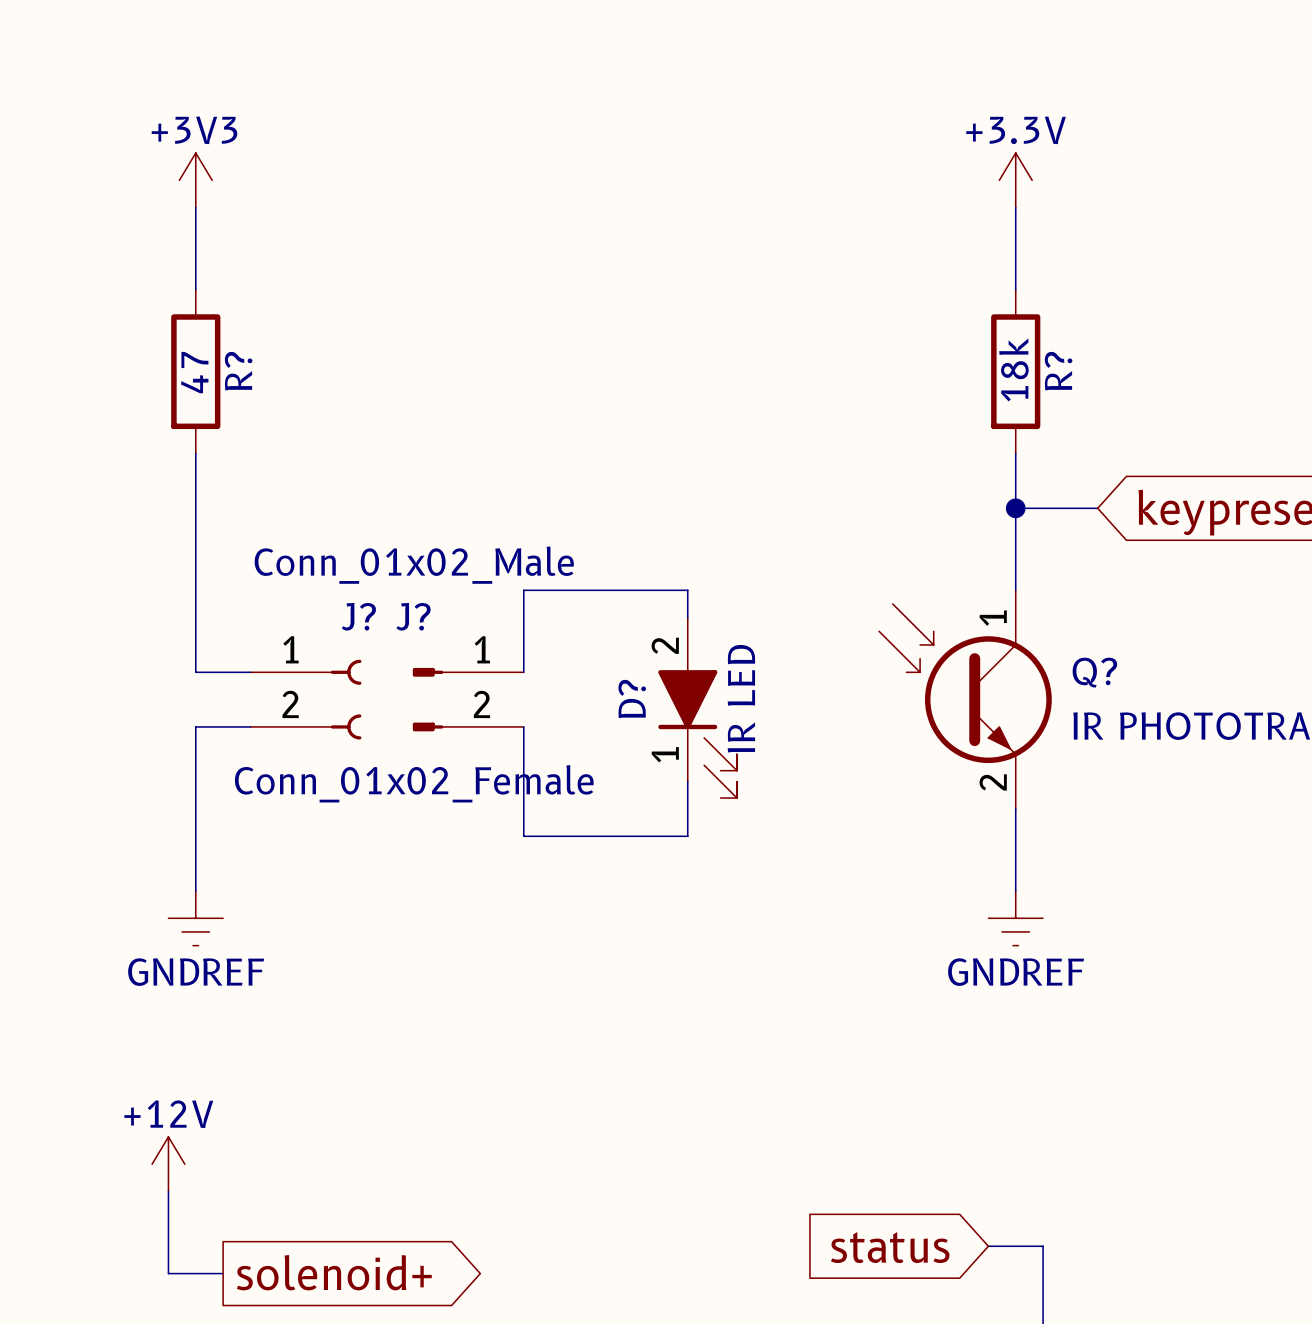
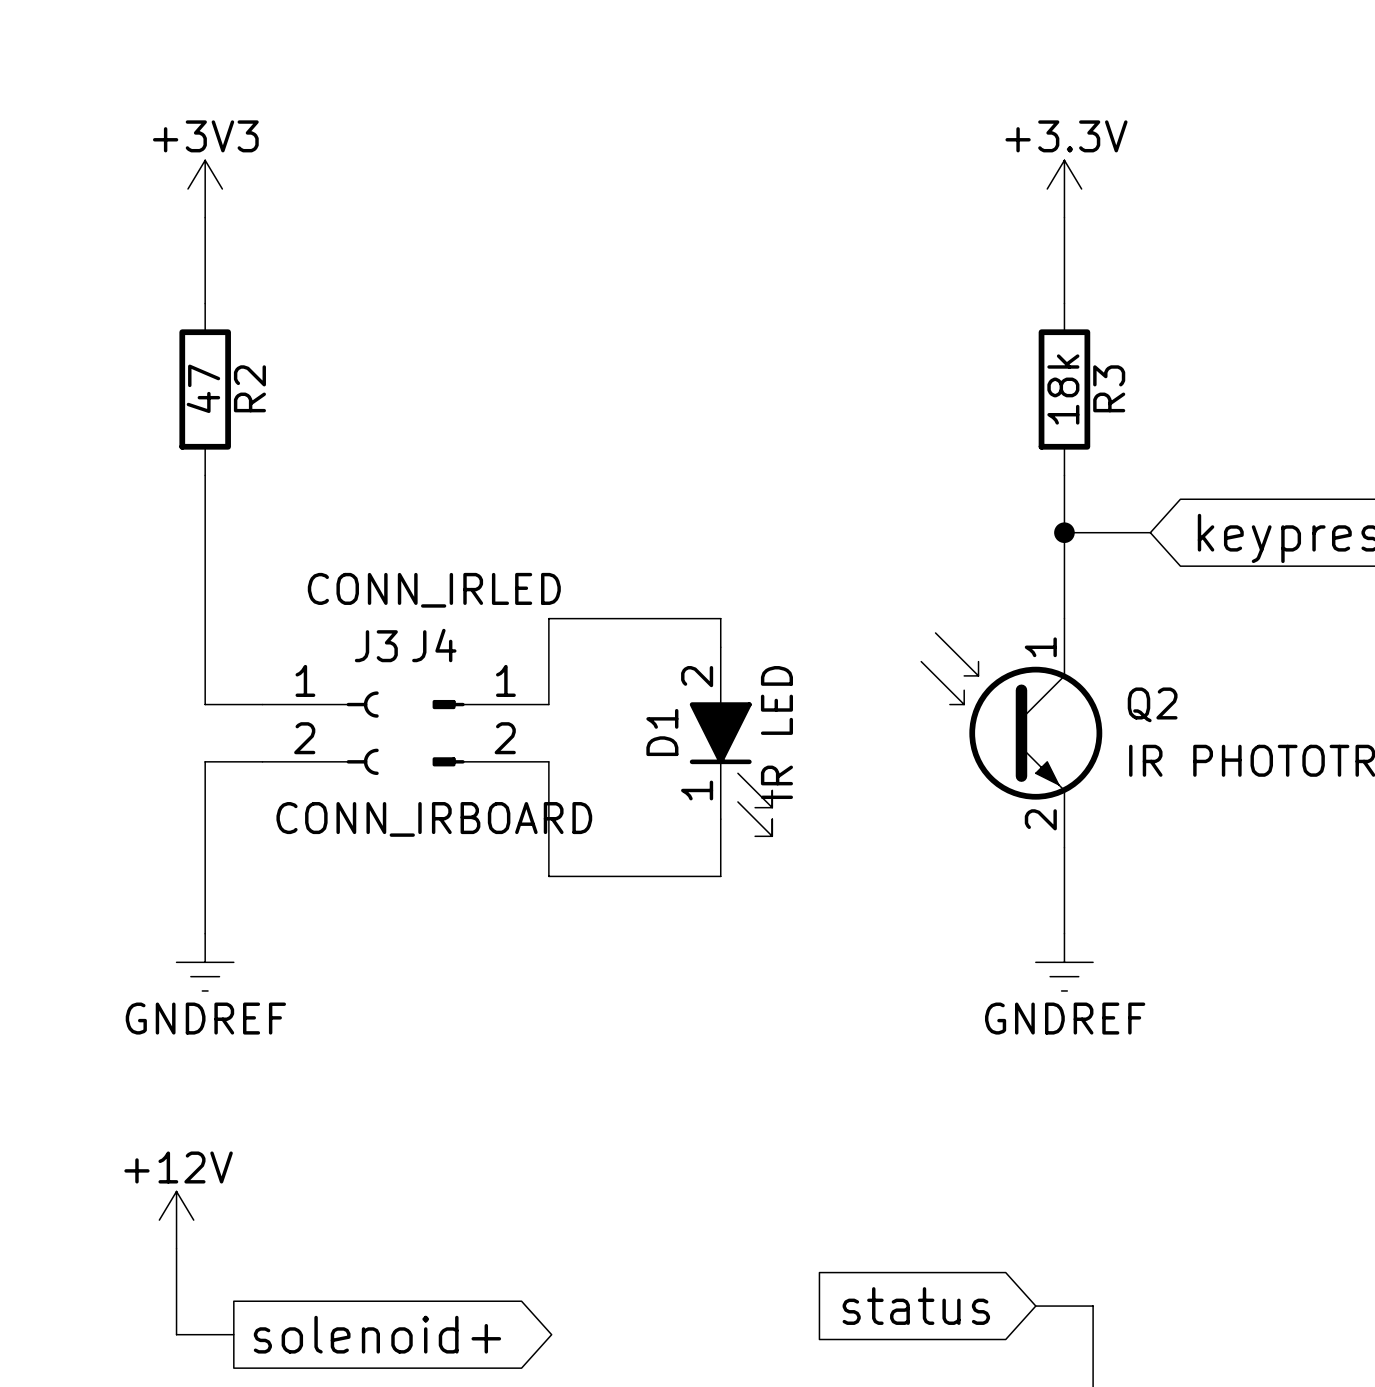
R? name: R? (238, 371) -> R2 (249, 388)
R? name: R? (1058, 371) -> R3 (1109, 388)
J? value: Conn_01x02_Male (414, 565) -> CONN_IRLED (434, 590)
J? name: J? (358, 616) -> J3 (376, 646)
J? name: J? (413, 616) -> J4 (434, 645)
Q? name: Q? (1094, 672) -> Q2 (1152, 704)
D? name: D? (632, 699) -> D1 (662, 732)
J? value: Conn_01x02_Female (414, 783) -> CONN_IRBOARD (434, 819)

